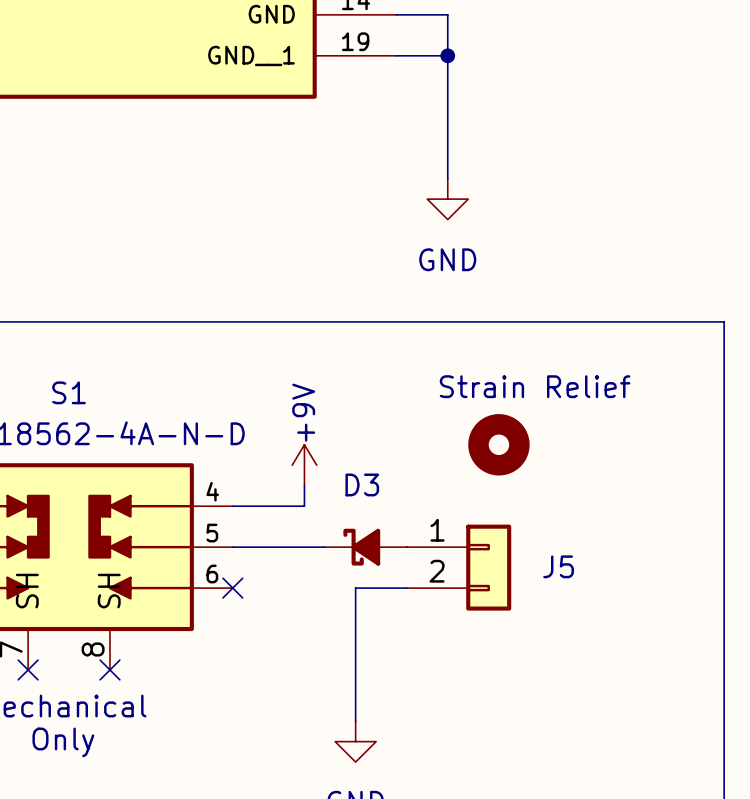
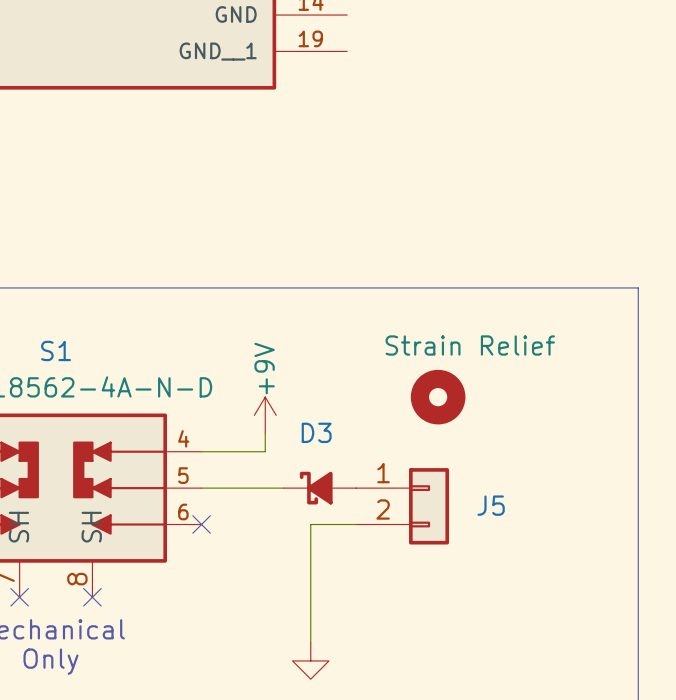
wire: (396, 14) (447, 14) (447, 178) -> none
wire: (396, 55) (447, 55) -> none
junction: (447, 55) -> none
power symbol: GND (447, 199) -> none

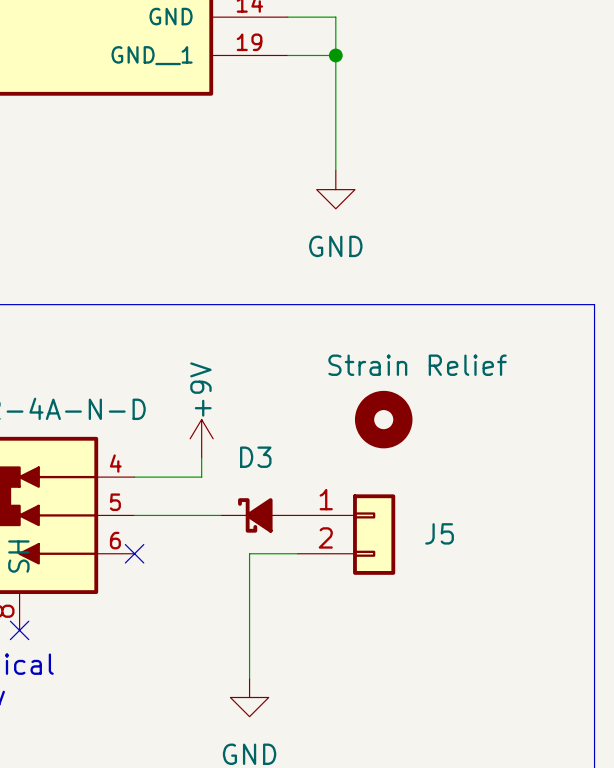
wire: none -> (287, 17) (335, 17) (335, 170)
wire: none -> (287, 55) (335, 55)
junction: none -> (335, 55)
power symbol: none -> GND (335, 189)

